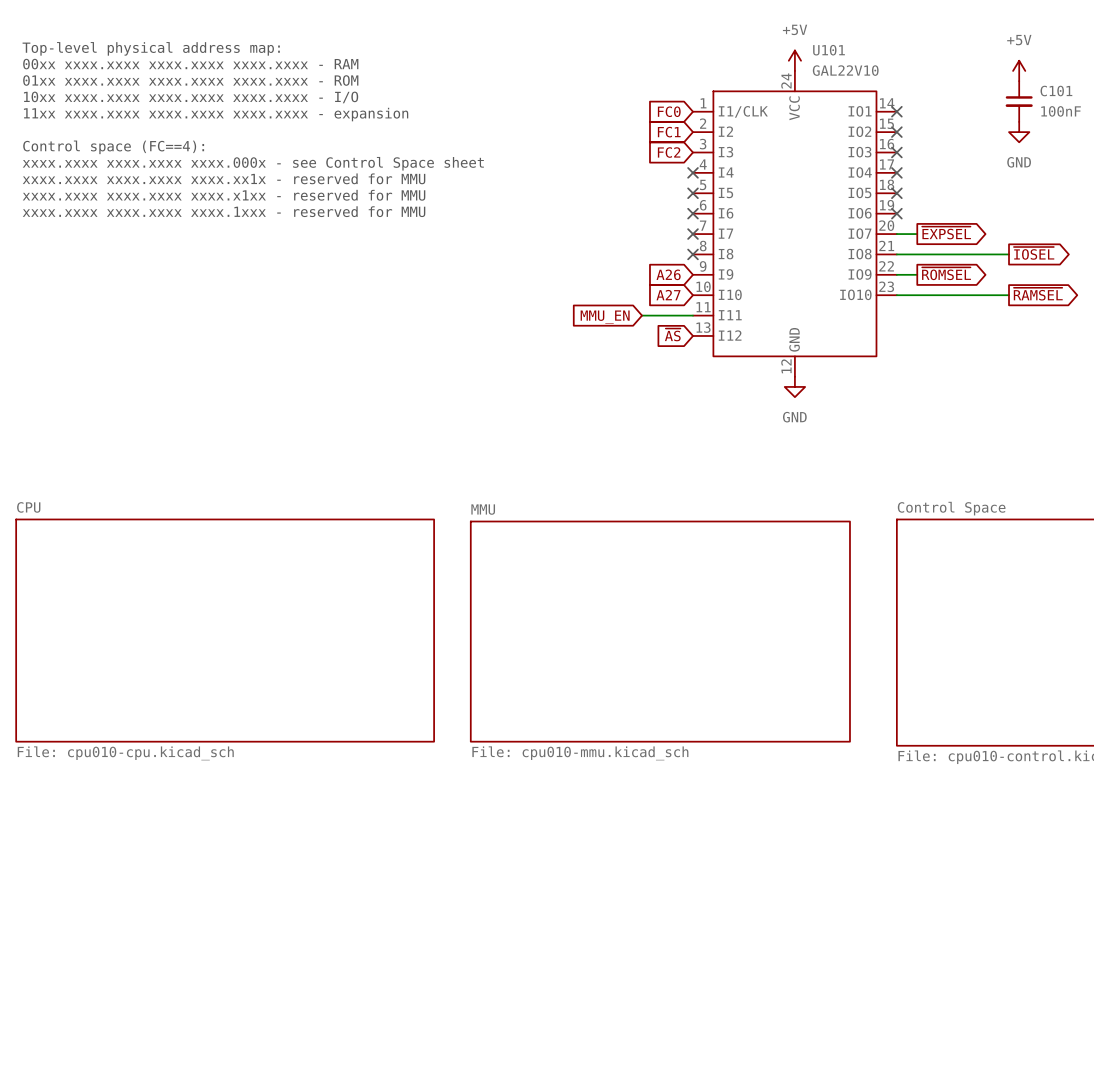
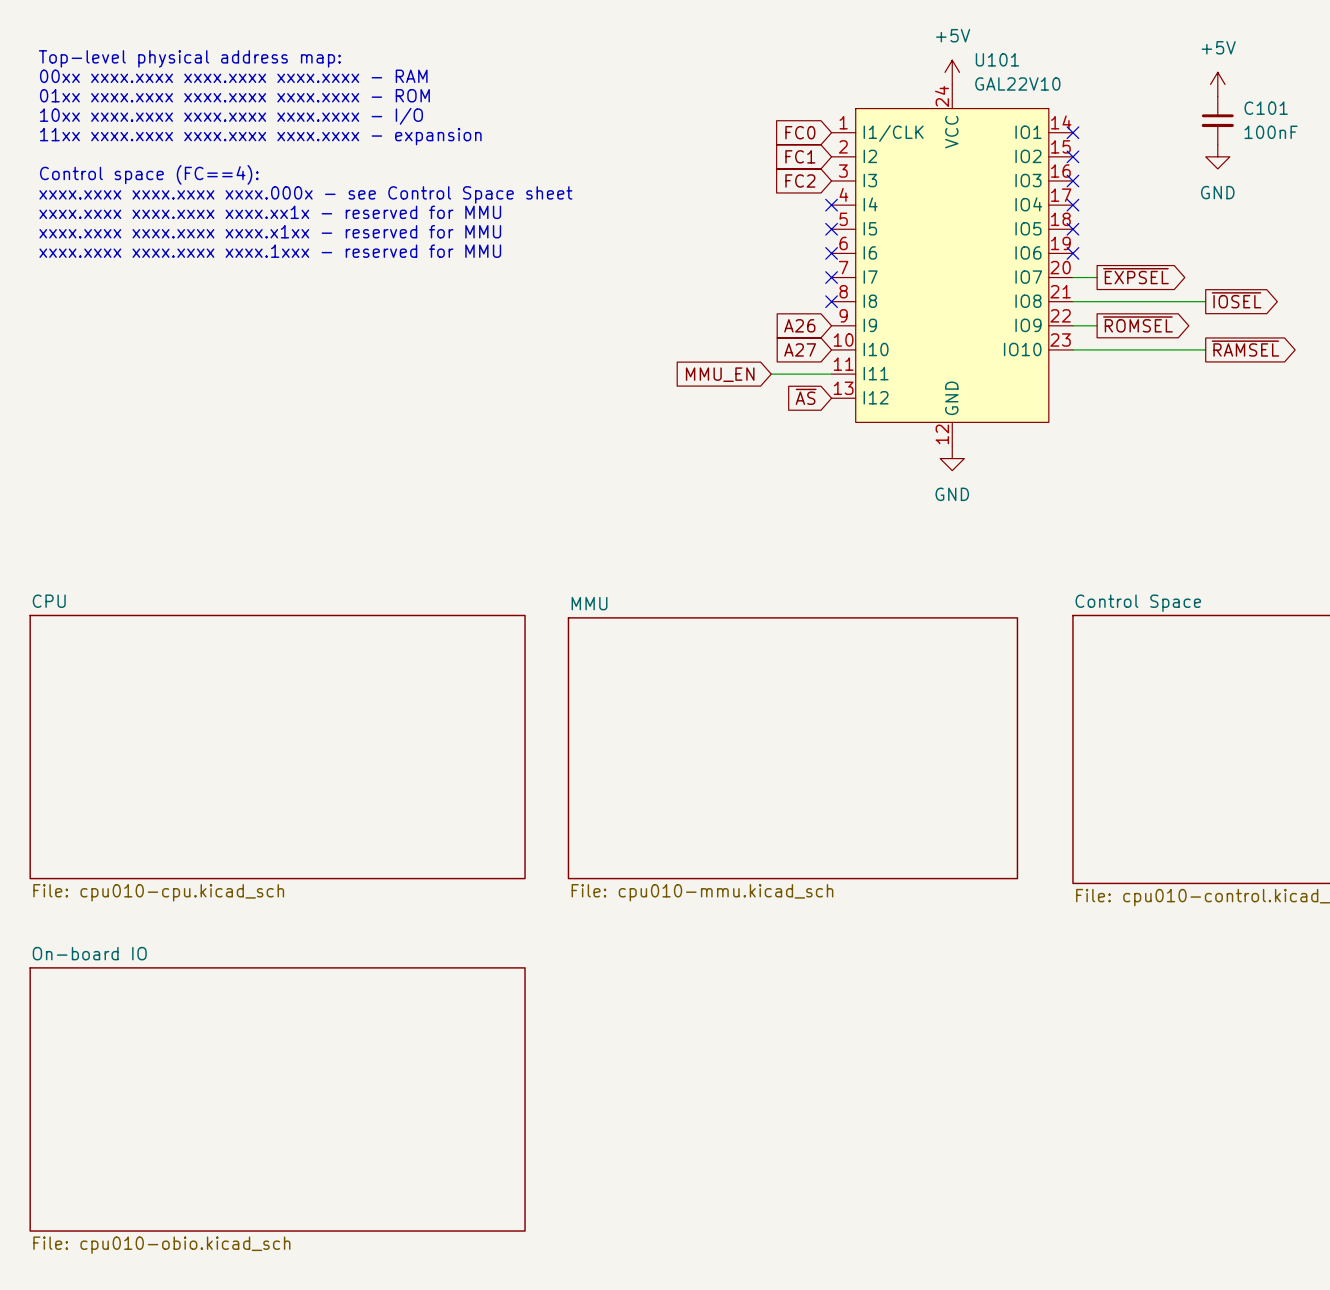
sheet On-board IO: none -> File: cpu010-obio.kicad_sch (277, 1099)

